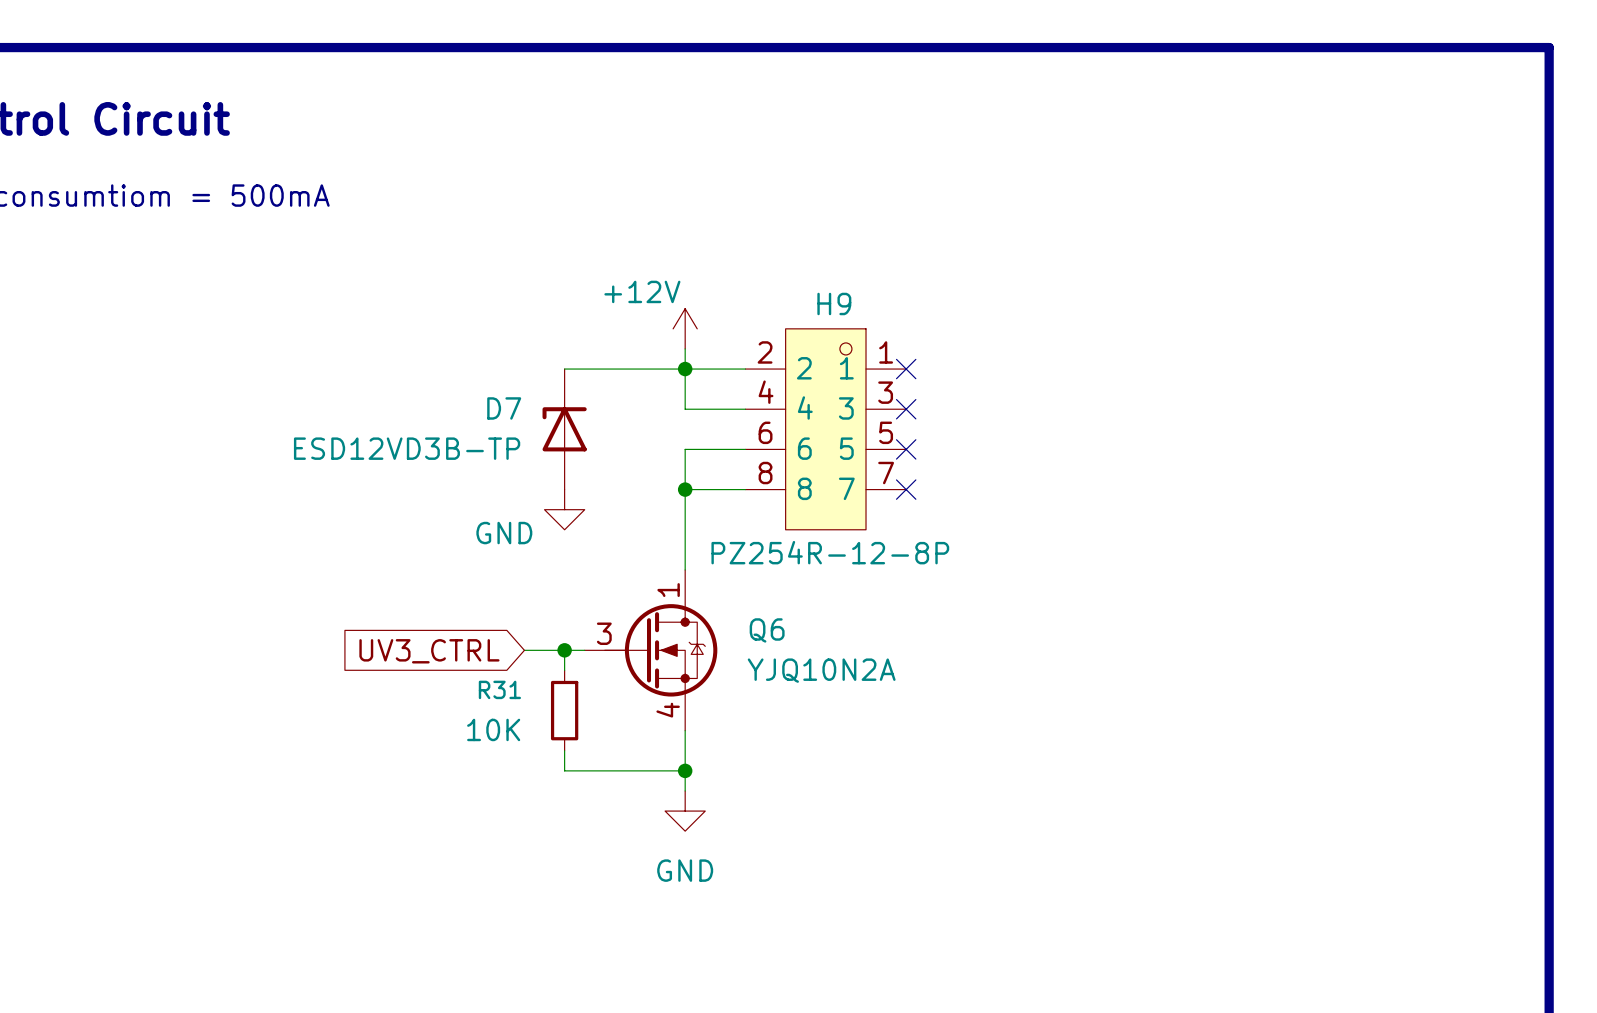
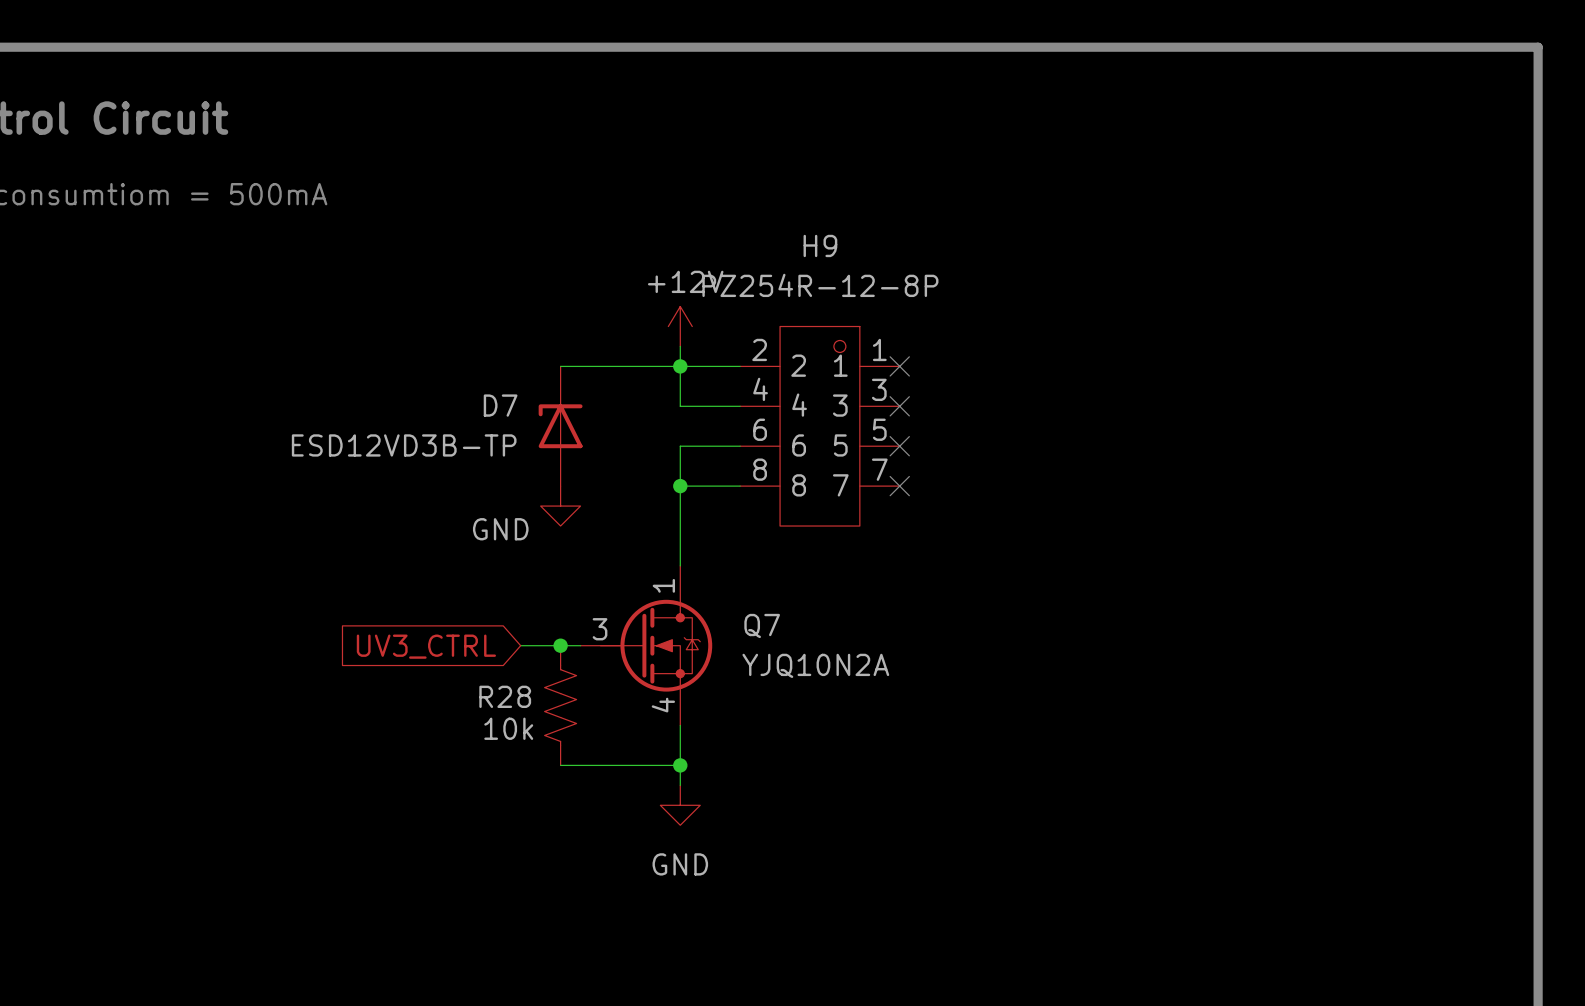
power symbol text position: +12V (642, 291) -> +12V (685, 281)
H9 name position: H9 (834, 303) -> H9 (820, 245)
H9 value position: PZ254R-12-8P (830, 552) -> PZ254R-12-8P (820, 285)
Q6 name: Q6 (767, 630) -> Q7 (762, 625)
R31: 10K (564, 710) -> none
R28: none -> 10k (560, 705)

